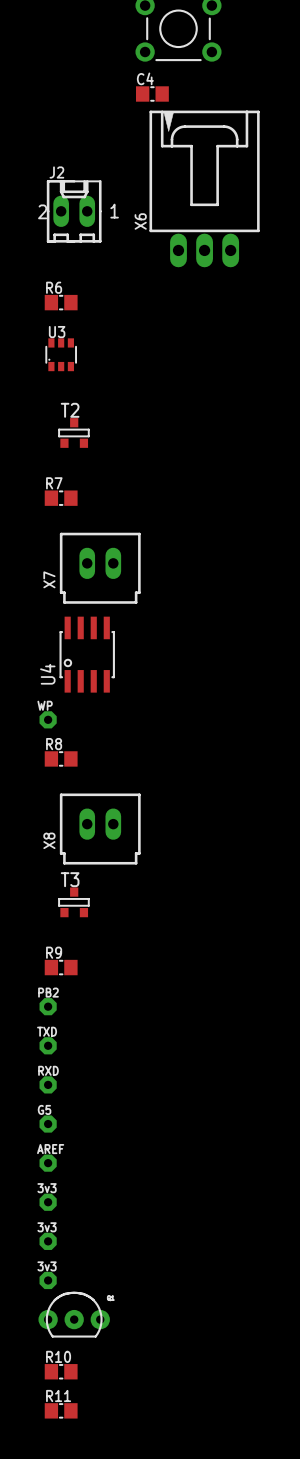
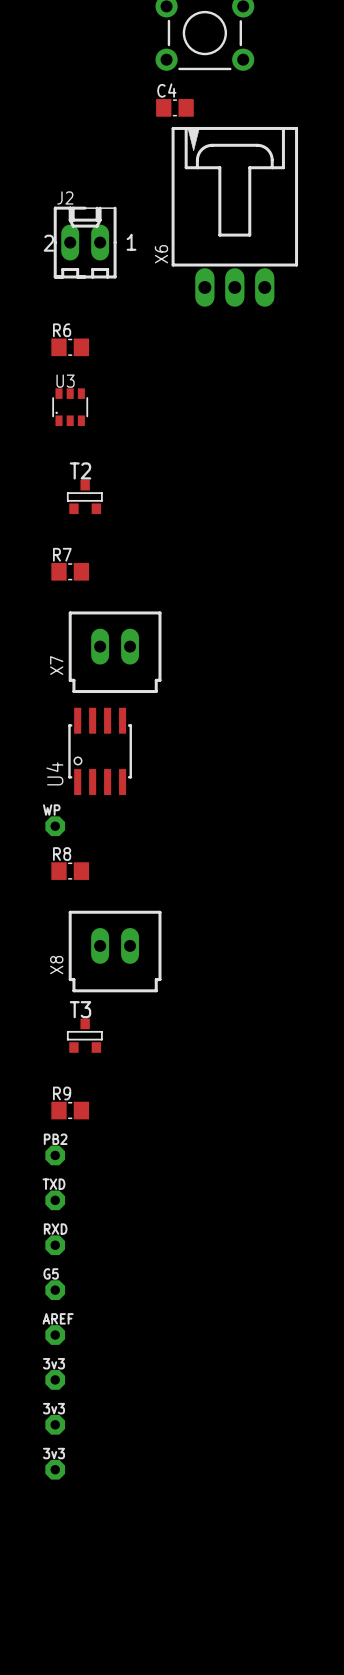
part: (74, 1314) -> none
R10: (61, 1371) -> none
R11: (61, 1410) -> none

